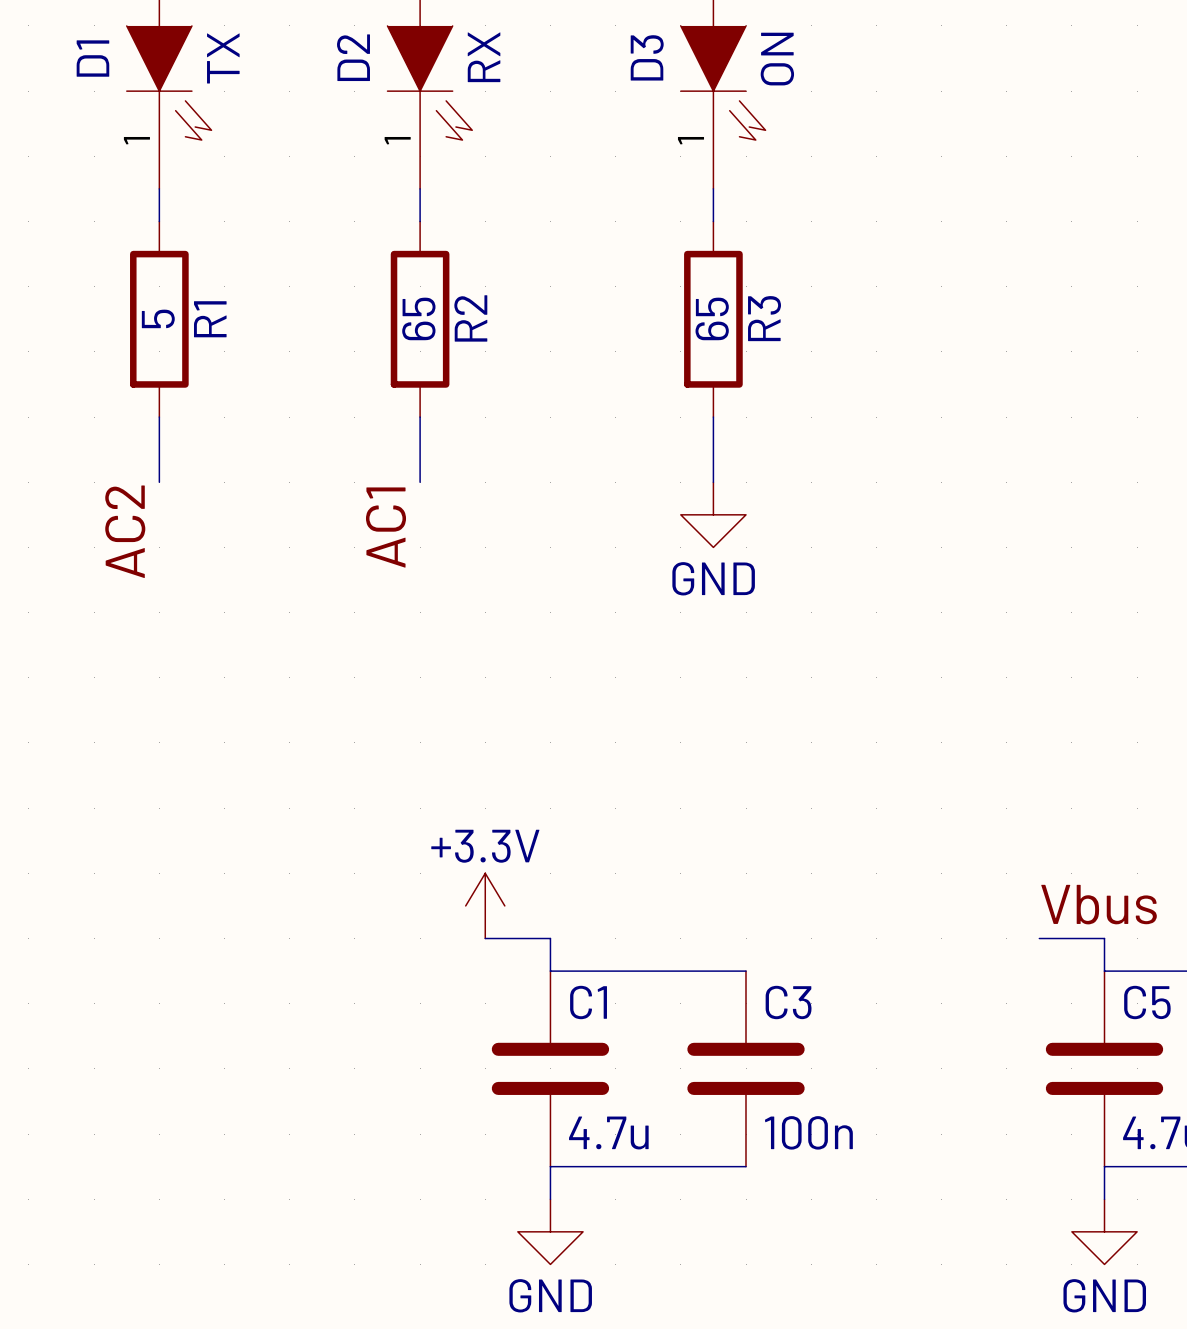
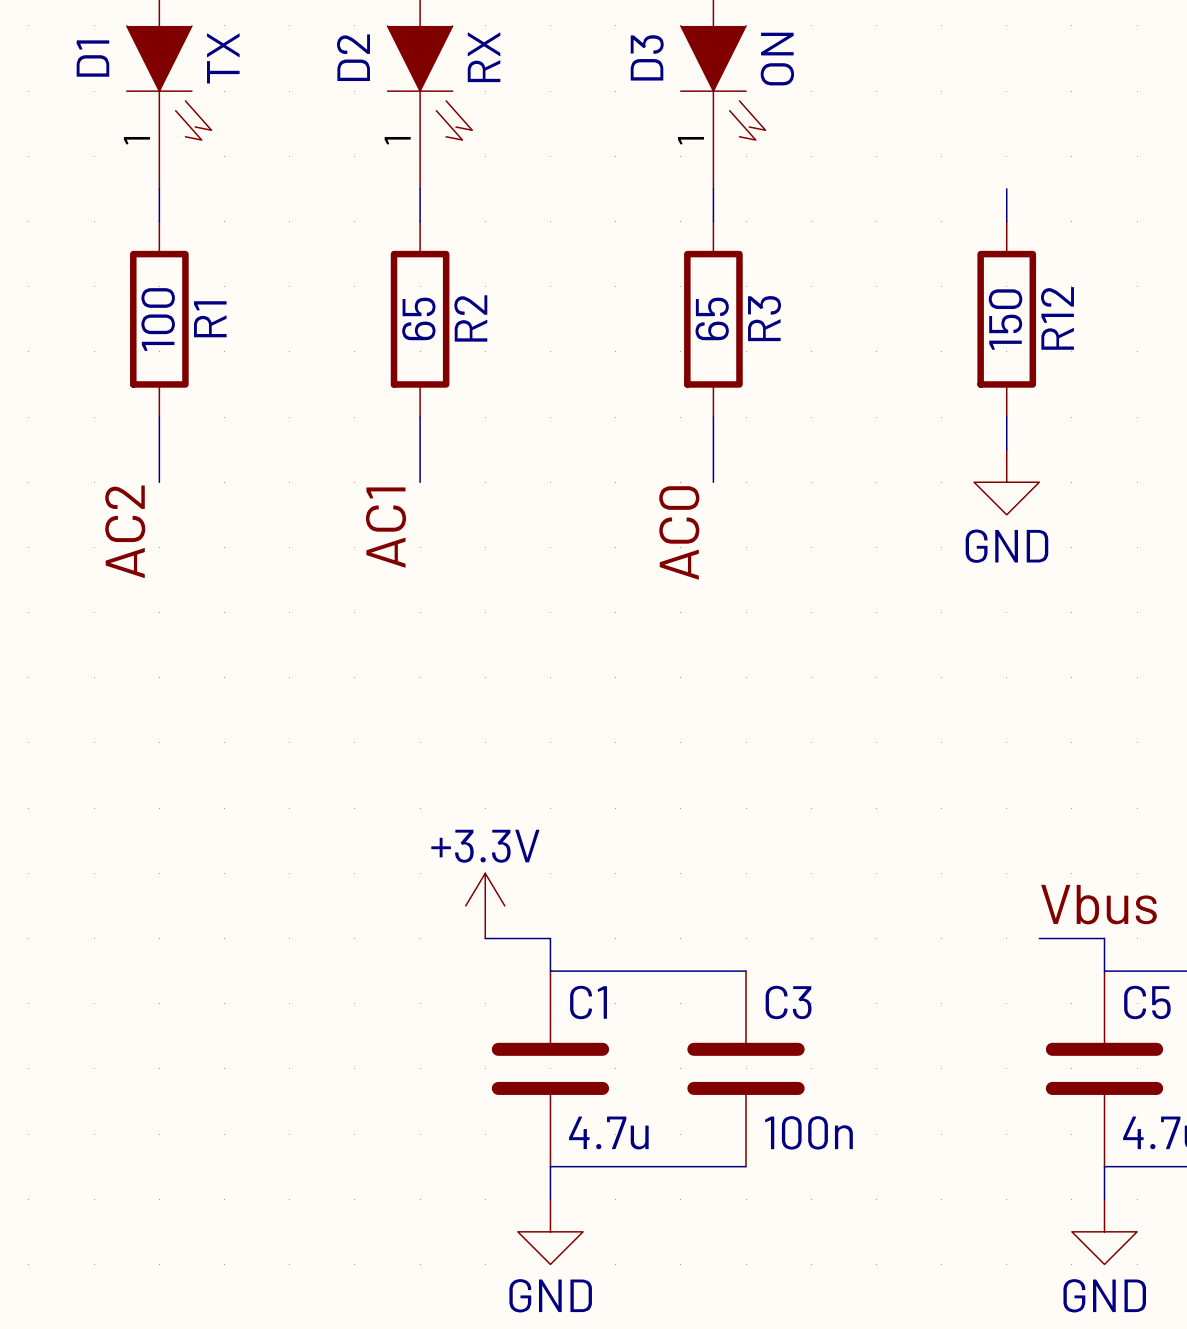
wire: none -> (1006, 188) (1006, 221)
R1 value: 5 (158, 318) -> 100 (158, 319)
R12: none -> 150 (1006, 319)
wire: none -> (1006, 417) (1006, 449)
power symbol position: GND (713, 514) -> GND (1006, 482)
label: none -> AC0 (679, 532)

